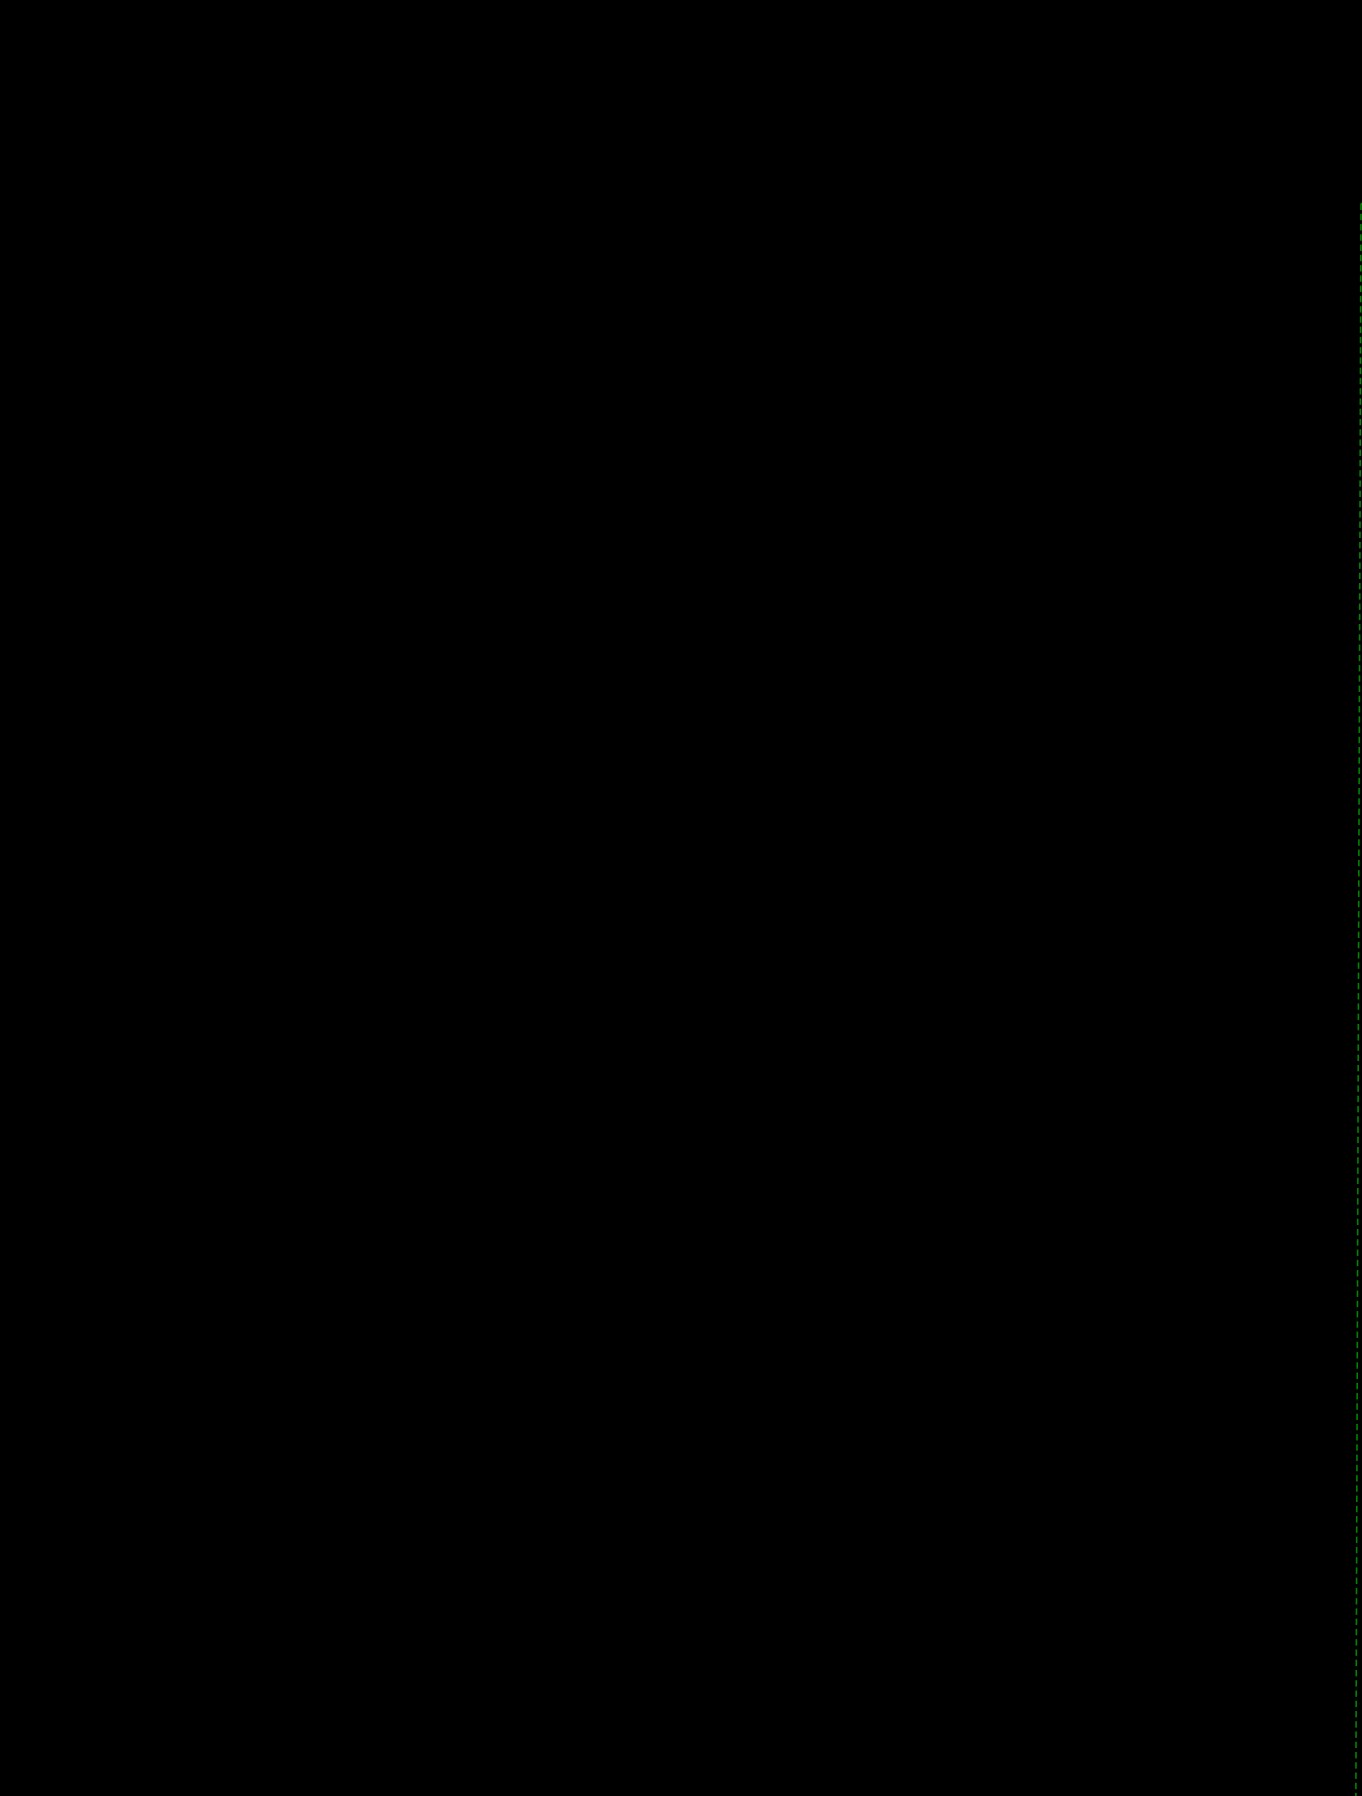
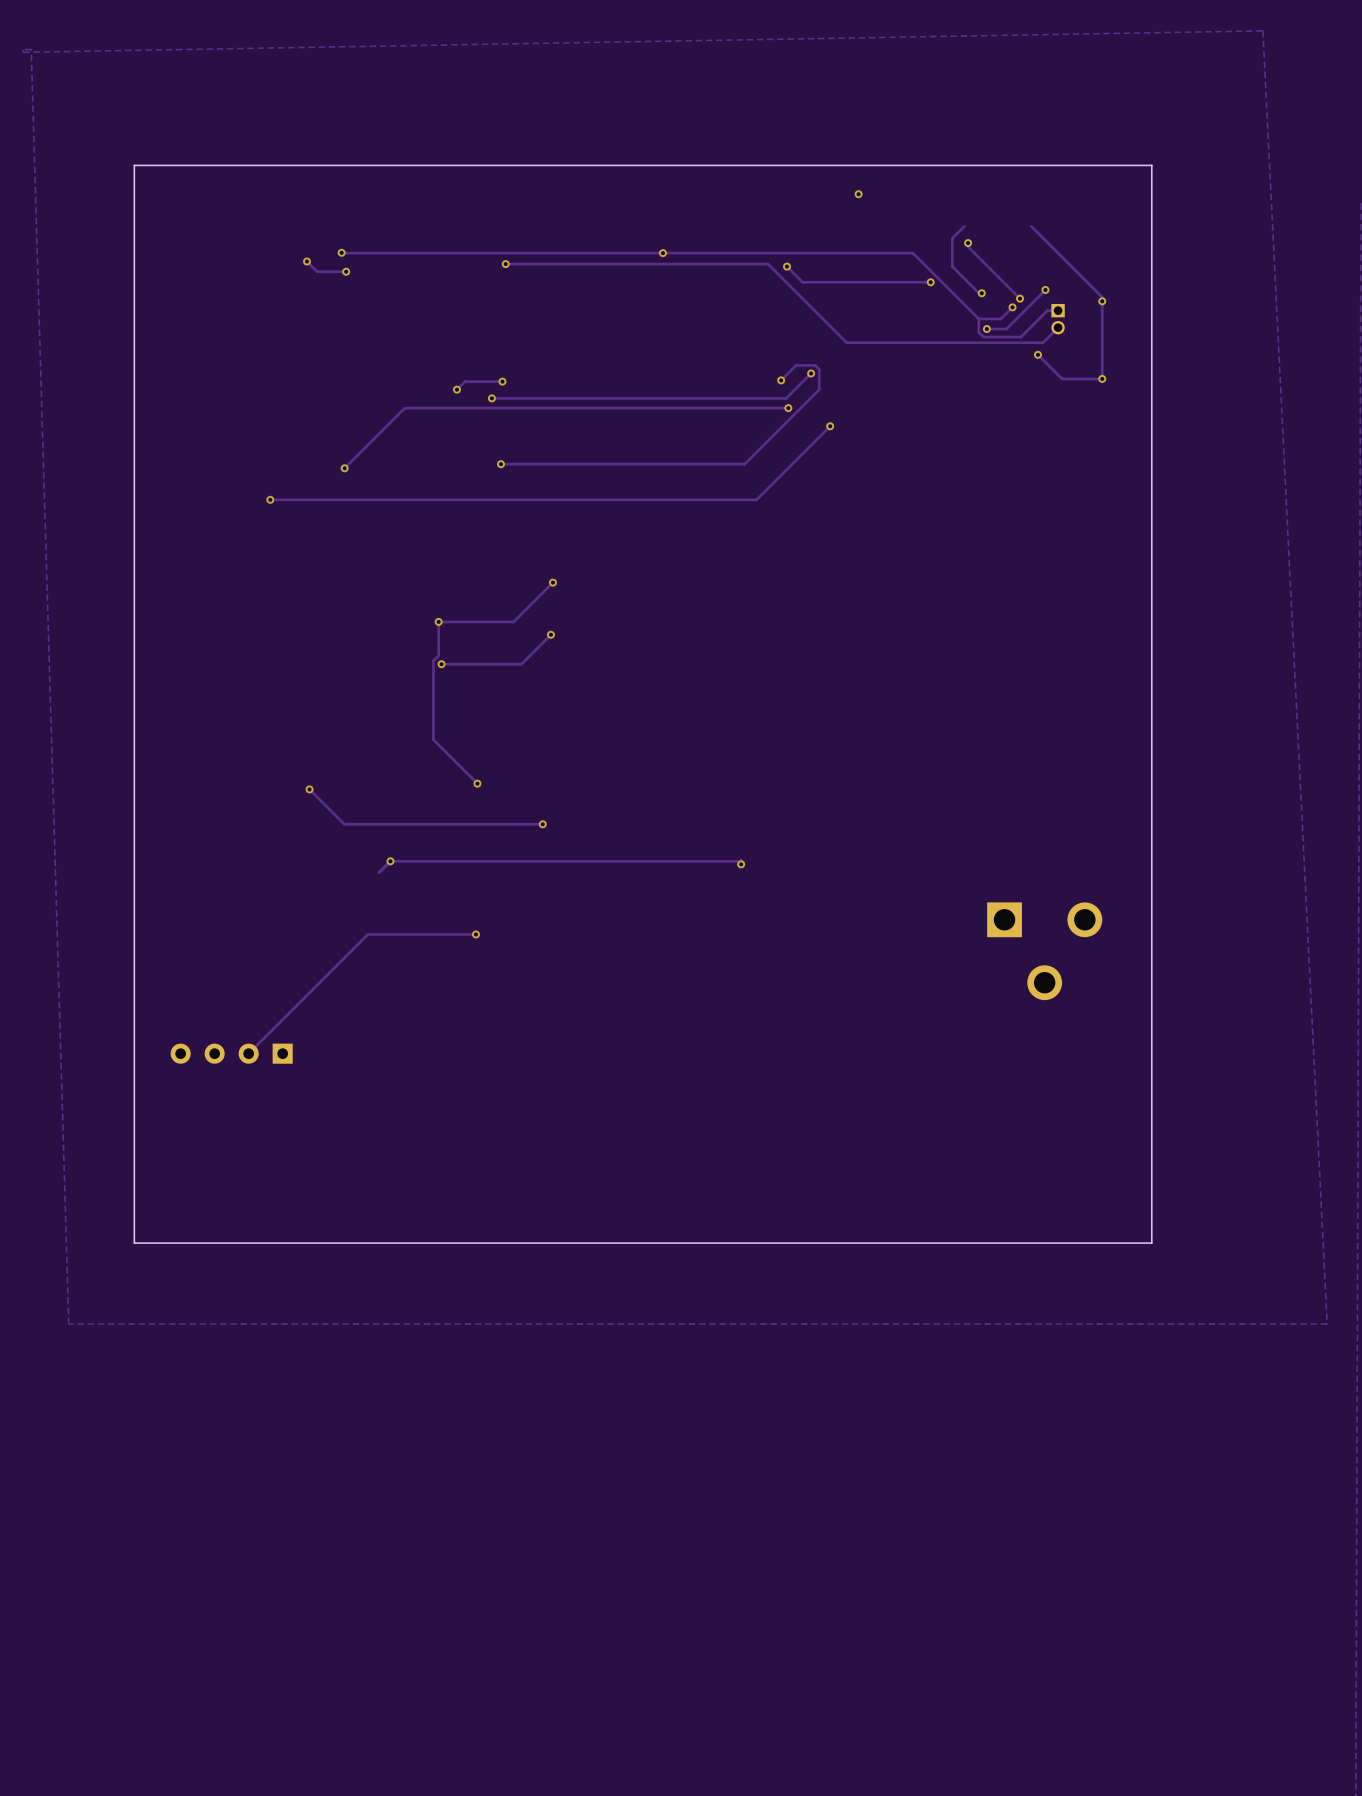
zone outline: none -> (1262, 30) (23, 52) (23, 49) (31, 49) (68, 1324) (1327, 1324) (1262, 30)
board edge: none -> (1151, 165) (134, 165) (134, 1243) (1151, 1243) (1151, 165)
via: none -> (858, 194)
track: none -> (964, 226) (952, 238) (952, 266) (979, 293) (981, 293)
track: none -> (1031, 226) (1102, 297) (1102, 378) (1062, 378) (1037, 354)
track: none -> (968, 243) (968, 246) (1020, 298)
via: none -> (968, 243)
track: none -> (341, 252) (912, 253) (978, 319)
via: none -> (341, 252)
via: none -> (662, 253)
track: none -> (306, 261) (317, 271) (346, 271)
via: none -> (306, 261)
track: none -> (505, 264) (768, 264) (846, 342) (1043, 342) (1058, 327)
via: none -> (505, 264)
track: none -> (786, 266) (802, 282) (930, 282)
via: none -> (786, 266)
via: none -> (346, 271)
via: none -> (930, 282)
track: none -> (1045, 289) (1006, 329) (986, 329)
via: none -> (1045, 289)
via: none -> (981, 293)
via: none -> (1020, 298)
via: none -> (1102, 301)
track: none -> (1012, 307) (1000, 319) (978, 319)
via: none -> (1012, 307)
track: none -> (1058, 310) (1047, 310) (1020, 337) (983, 337) (978, 332) (978, 319)
part: none -> (1058, 319)
via: none -> (986, 329)
via: none -> (1037, 354)
track: none -> (811, 373) (786, 398) (491, 398)
via: none -> (811, 373)
via: none -> (1102, 378)
track: none -> (781, 380) (796, 365) (815, 365) (819, 369) (819, 389) (744, 464) (501, 464)
via: none -> (781, 380)
track: none -> (502, 381) (465, 381) (456, 389)
via: none -> (502, 381)
via: none -> (456, 389)
via: none -> (491, 398)
track: none -> (788, 408) (404, 408) (344, 468)
via: none -> (788, 408)
track: none -> (830, 426) (756, 499) (270, 499)
via: none -> (830, 426)
via: none -> (501, 464)
via: none -> (344, 468)
via: none -> (270, 499)
track: none -> (552, 582) (513, 621) (438, 621) (438, 655) (433, 660) (433, 739) (477, 783)
via: none -> (552, 582)
via: none -> (438, 621)
track: none -> (550, 634) (521, 664) (441, 664)
via: none -> (550, 634)
via: none -> (441, 664)
via: none -> (477, 783)
track: none -> (309, 789) (344, 824) (542, 824)
via: none -> (309, 789)
via: none -> (542, 824)
track: none -> (741, 860) (741, 864) (738, 861) (390, 861) (379, 872)
via: none -> (390, 861)
via: none -> (741, 864)
track: none -> (475, 934) (367, 934) (248, 1053)
via: none -> (475, 934)
part: none -> (1044, 951)
part: none -> (231, 1053)

